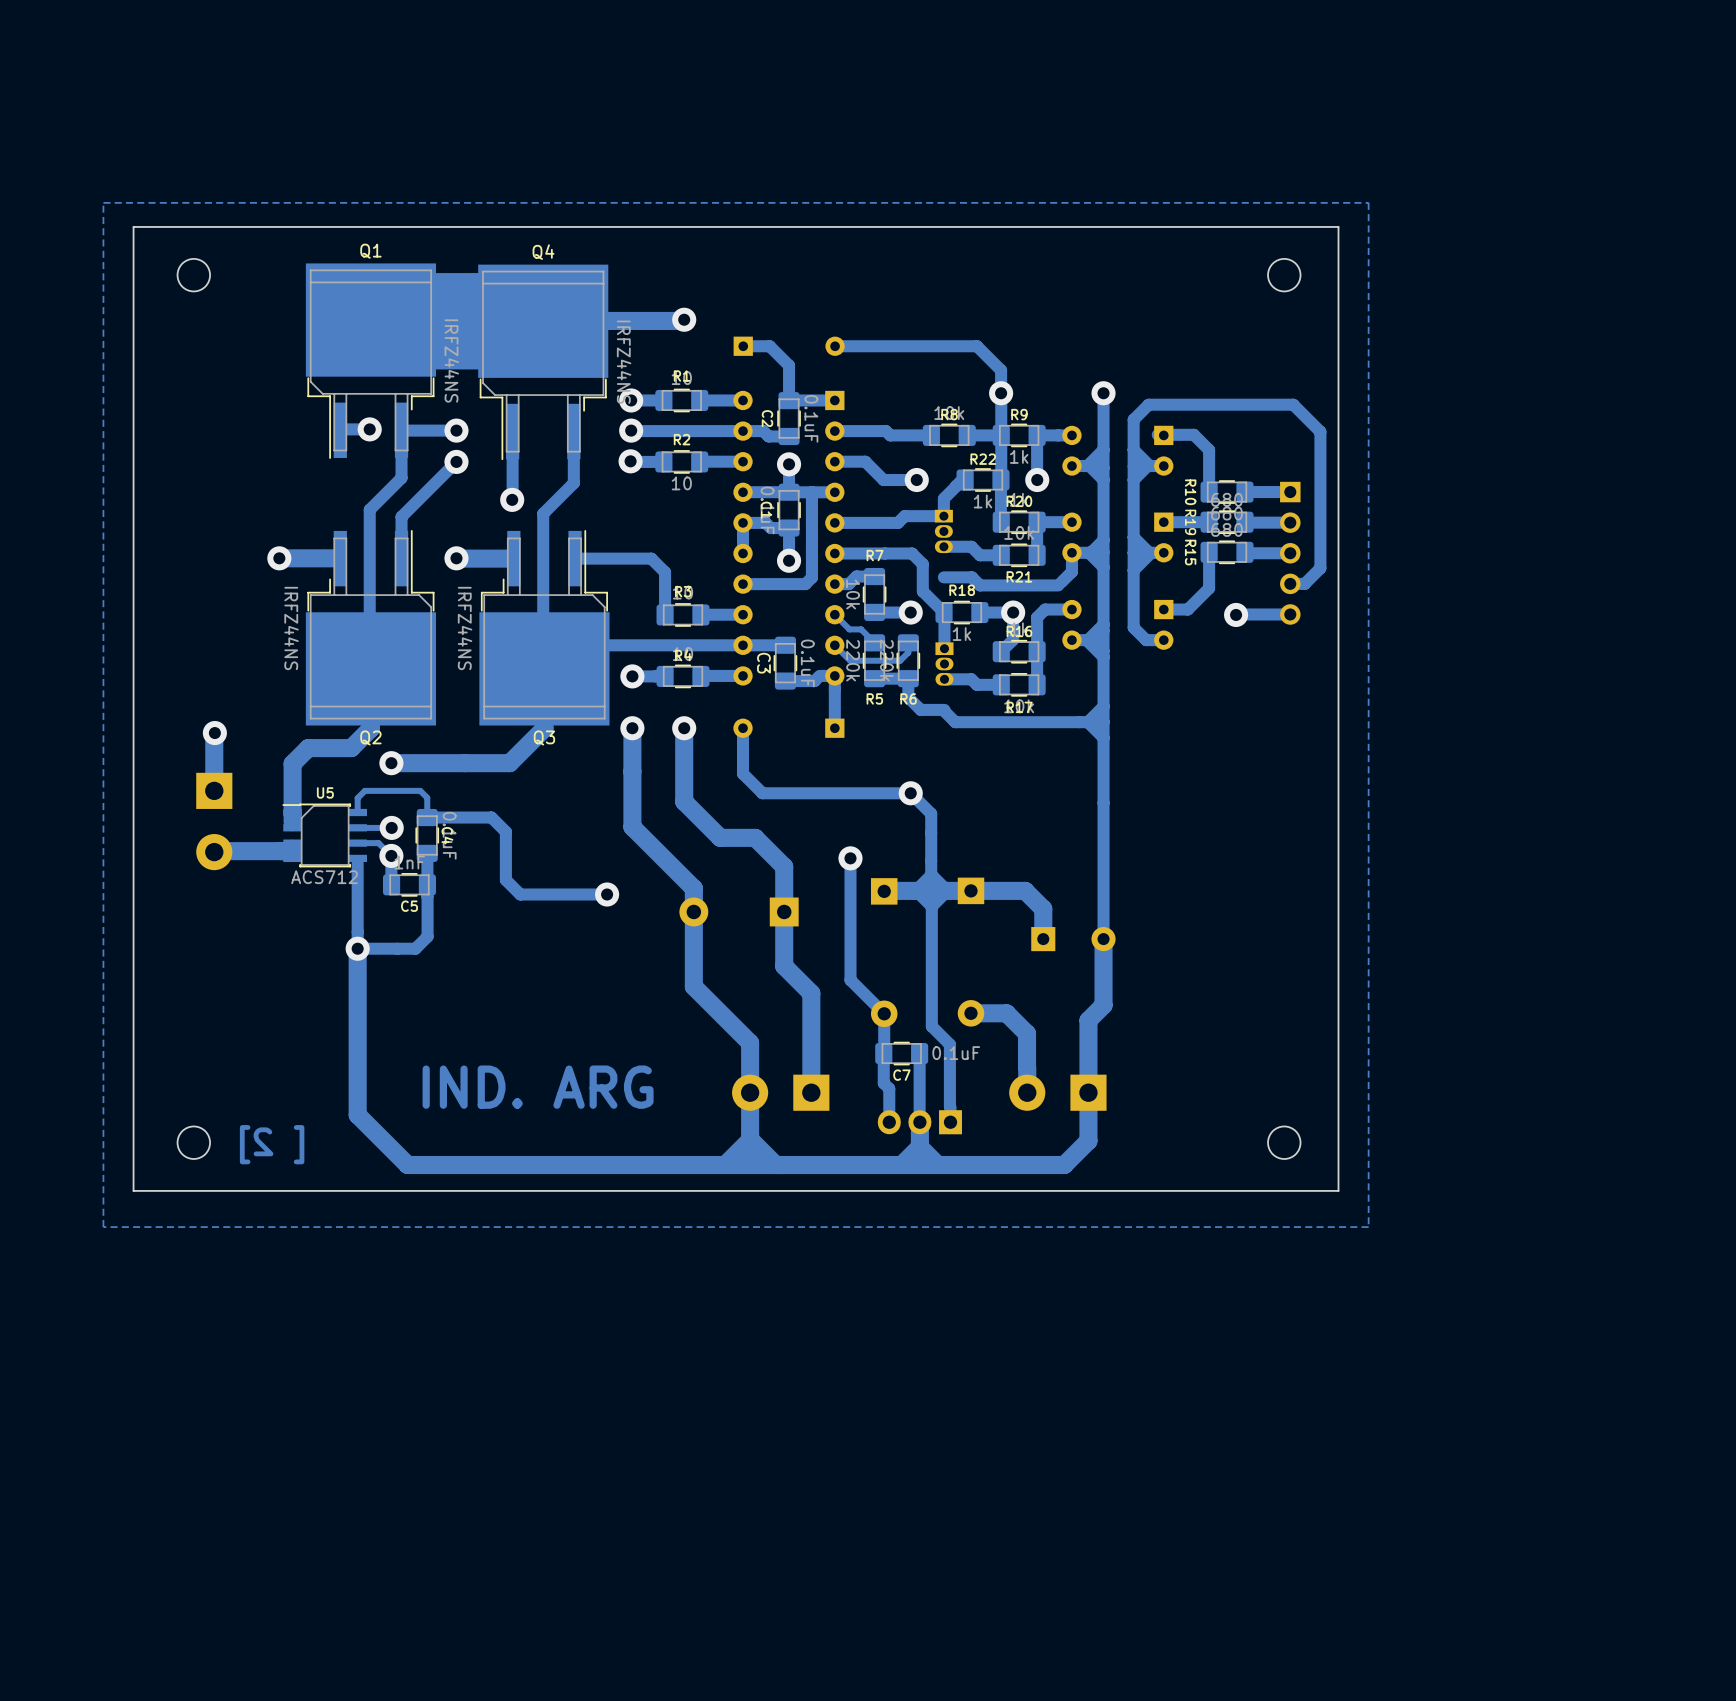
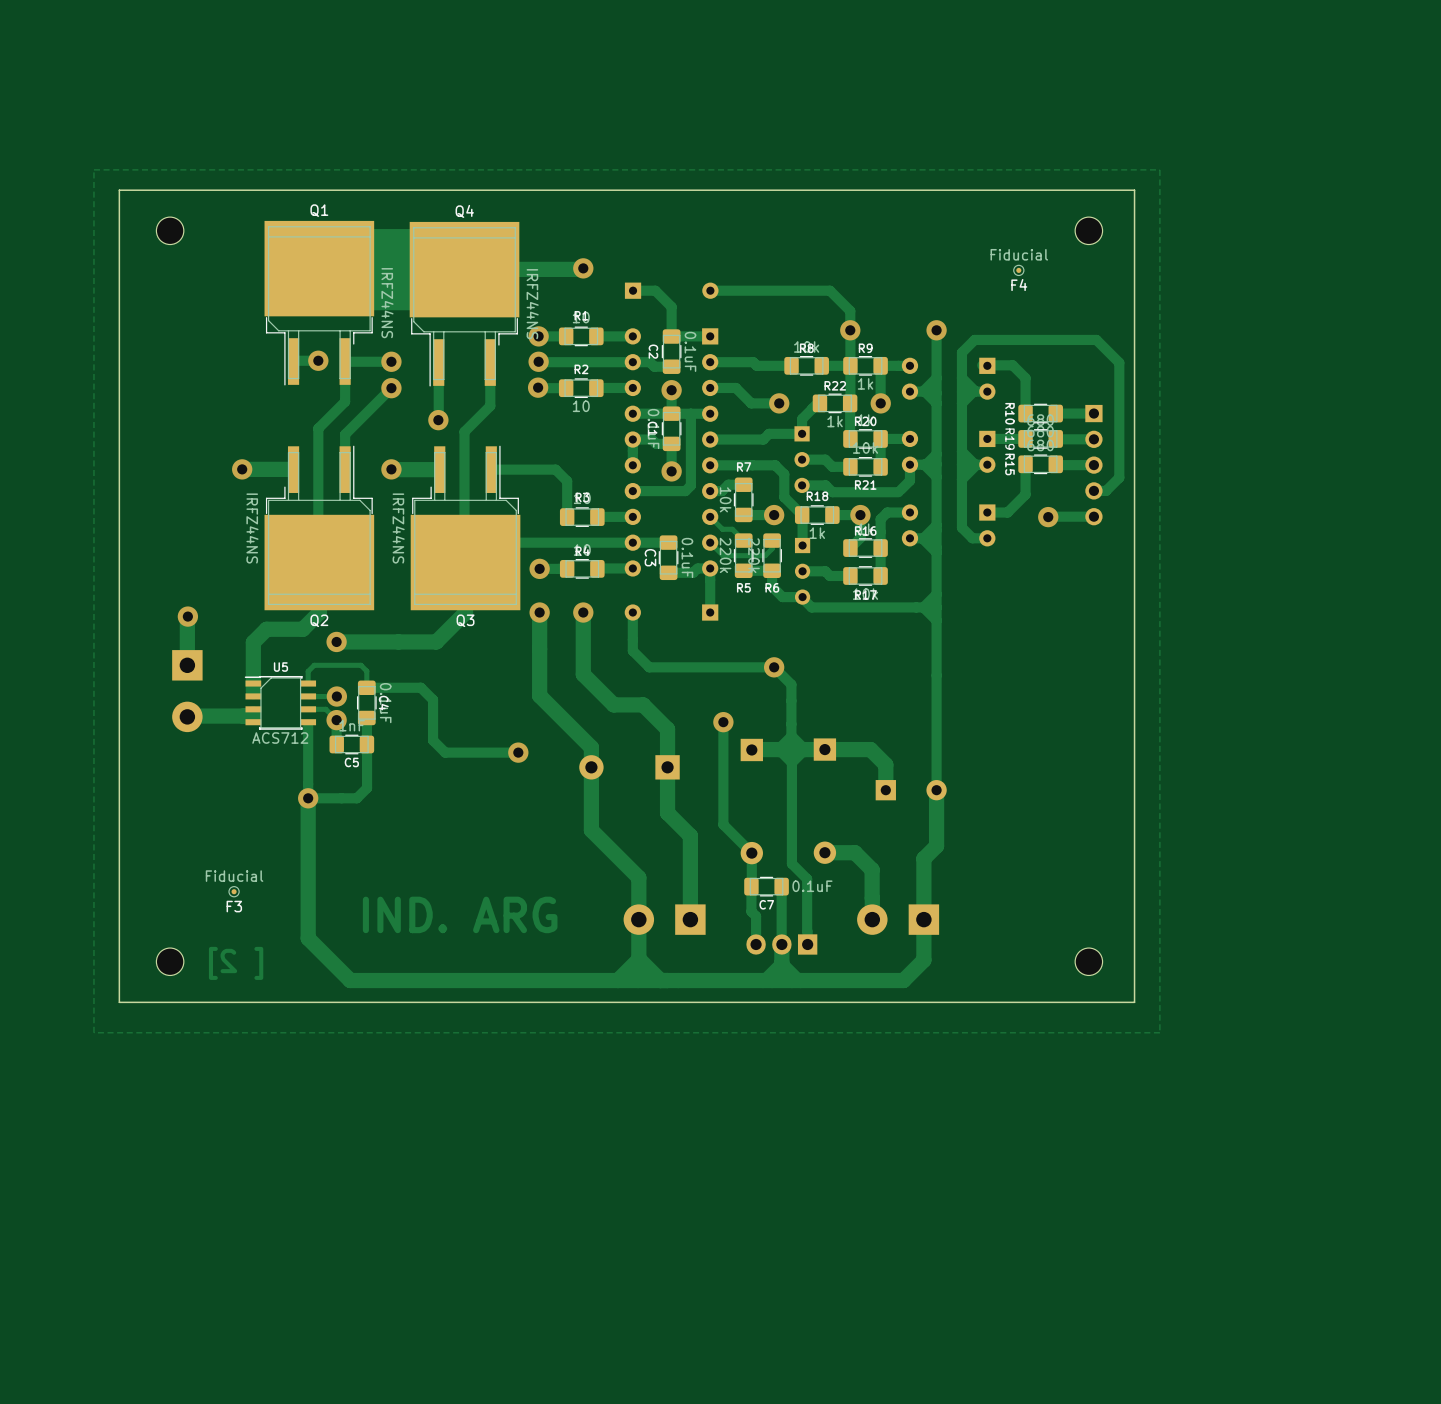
F4: none -> Fiducial (1018, 270)
part: (943, 531) -> none
part: none -> (802, 459)
part: (944, 664) -> none
part: none -> (802, 571)
F3: none -> Fiducial (234, 891)

